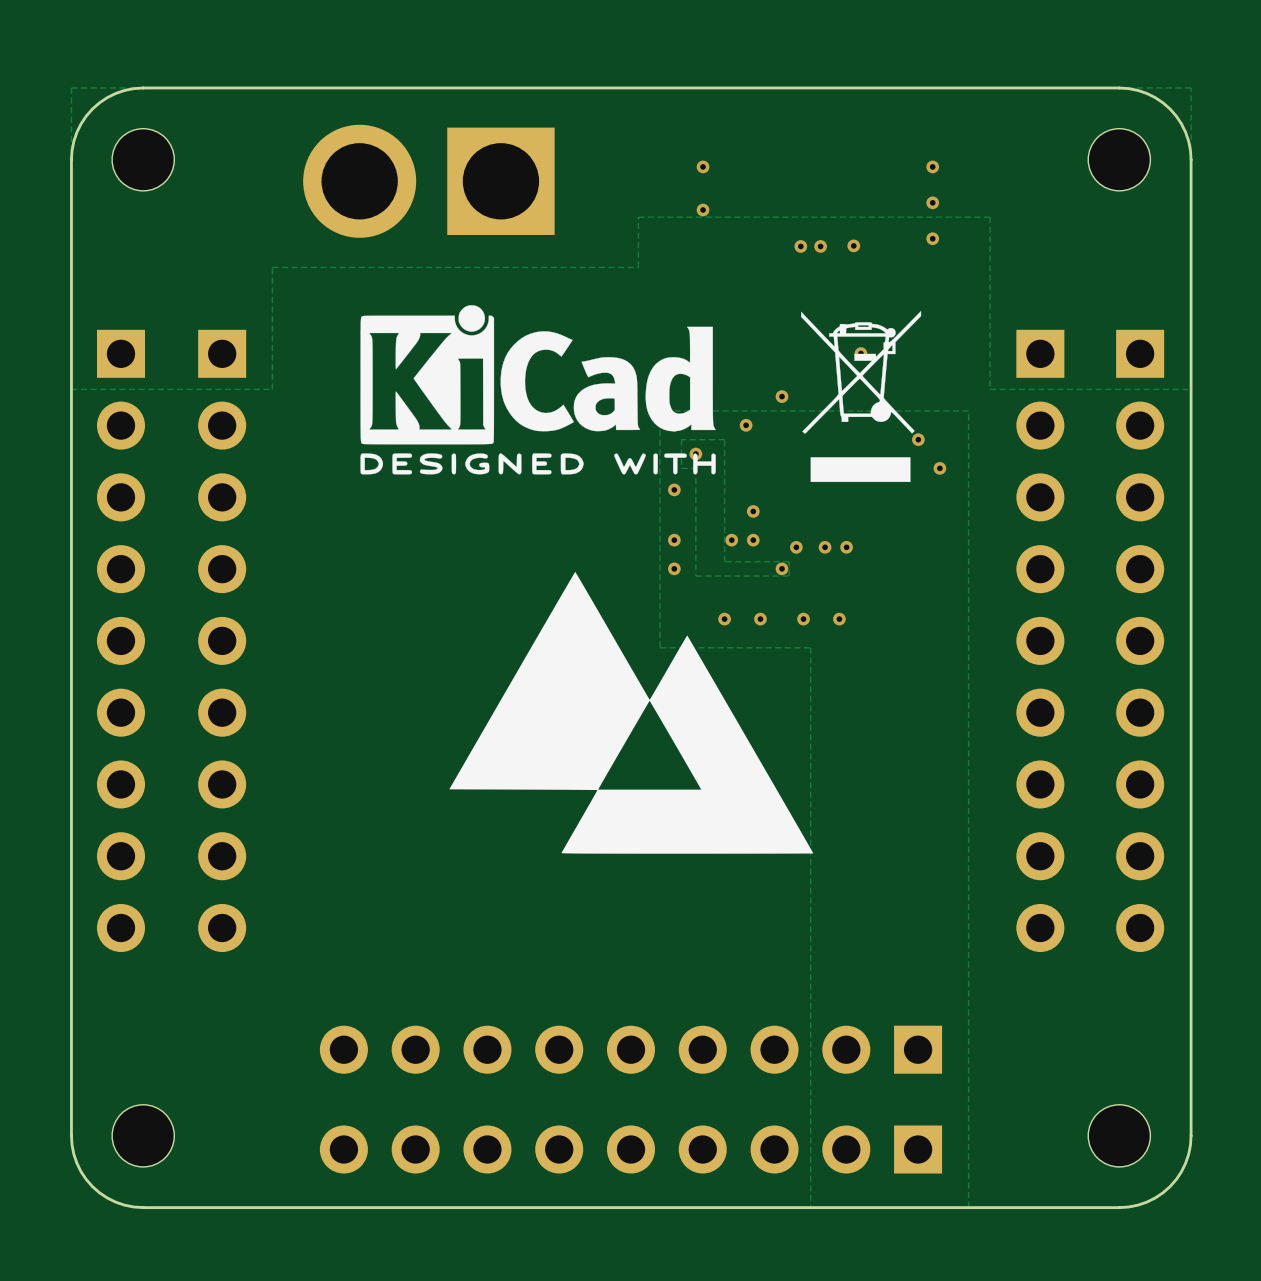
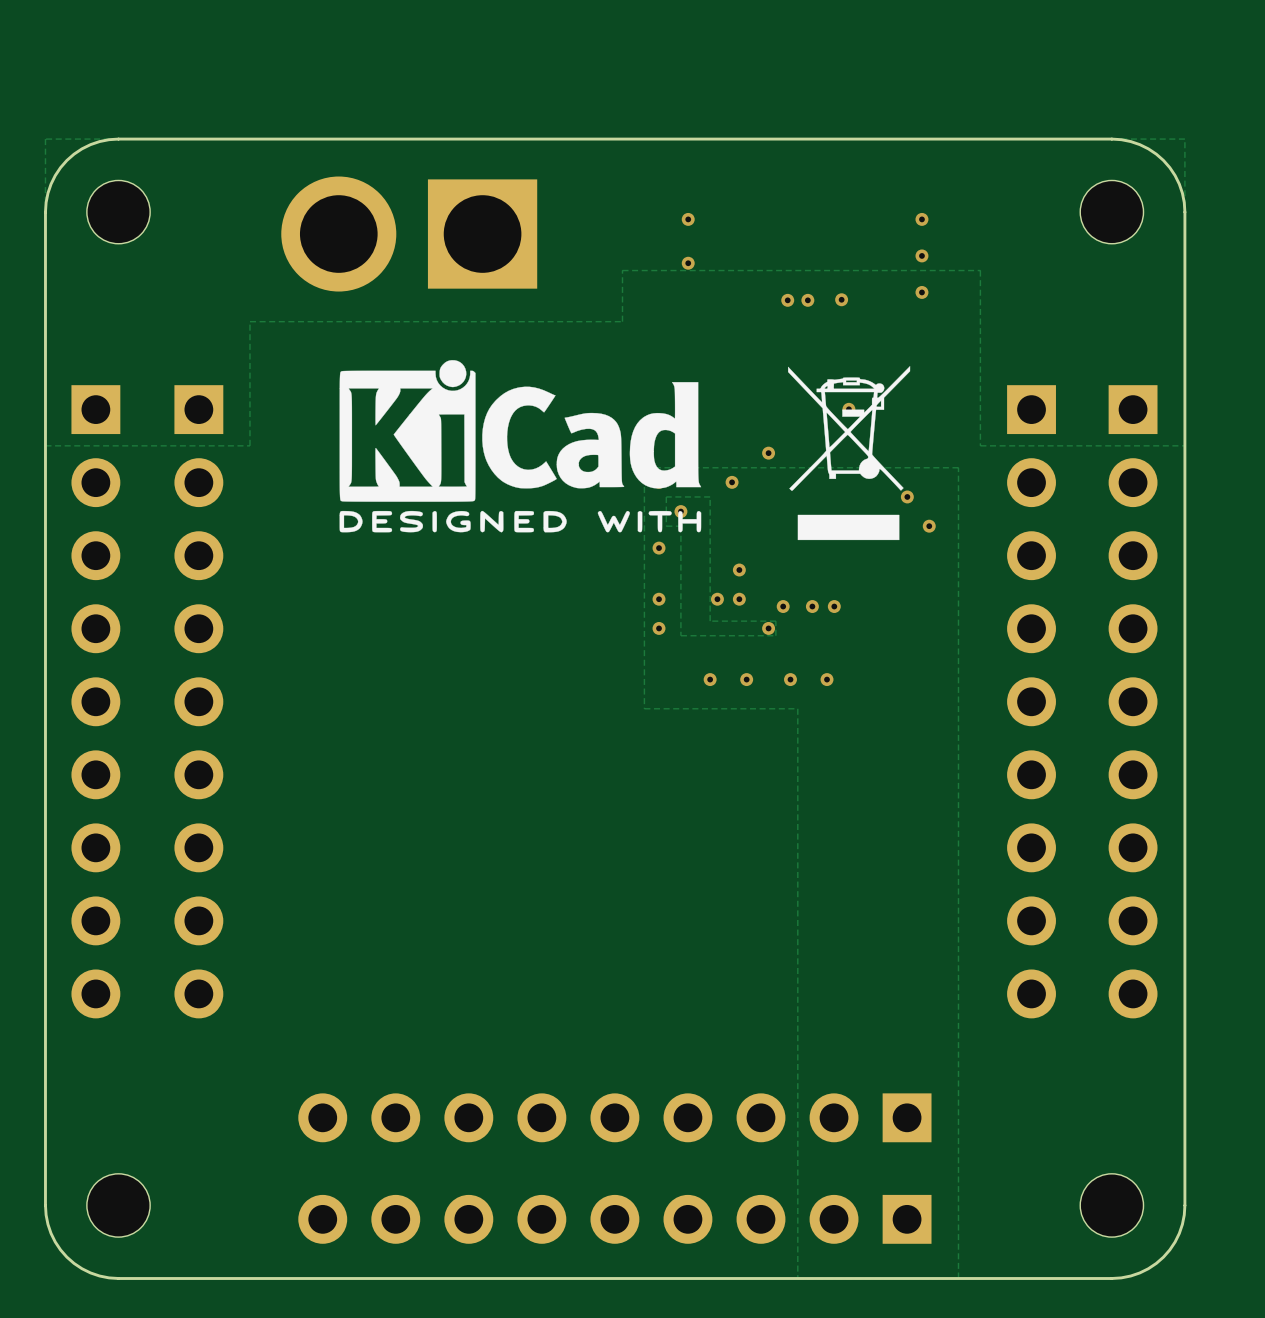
drawing: [449, 571, 814, 854] -> none

